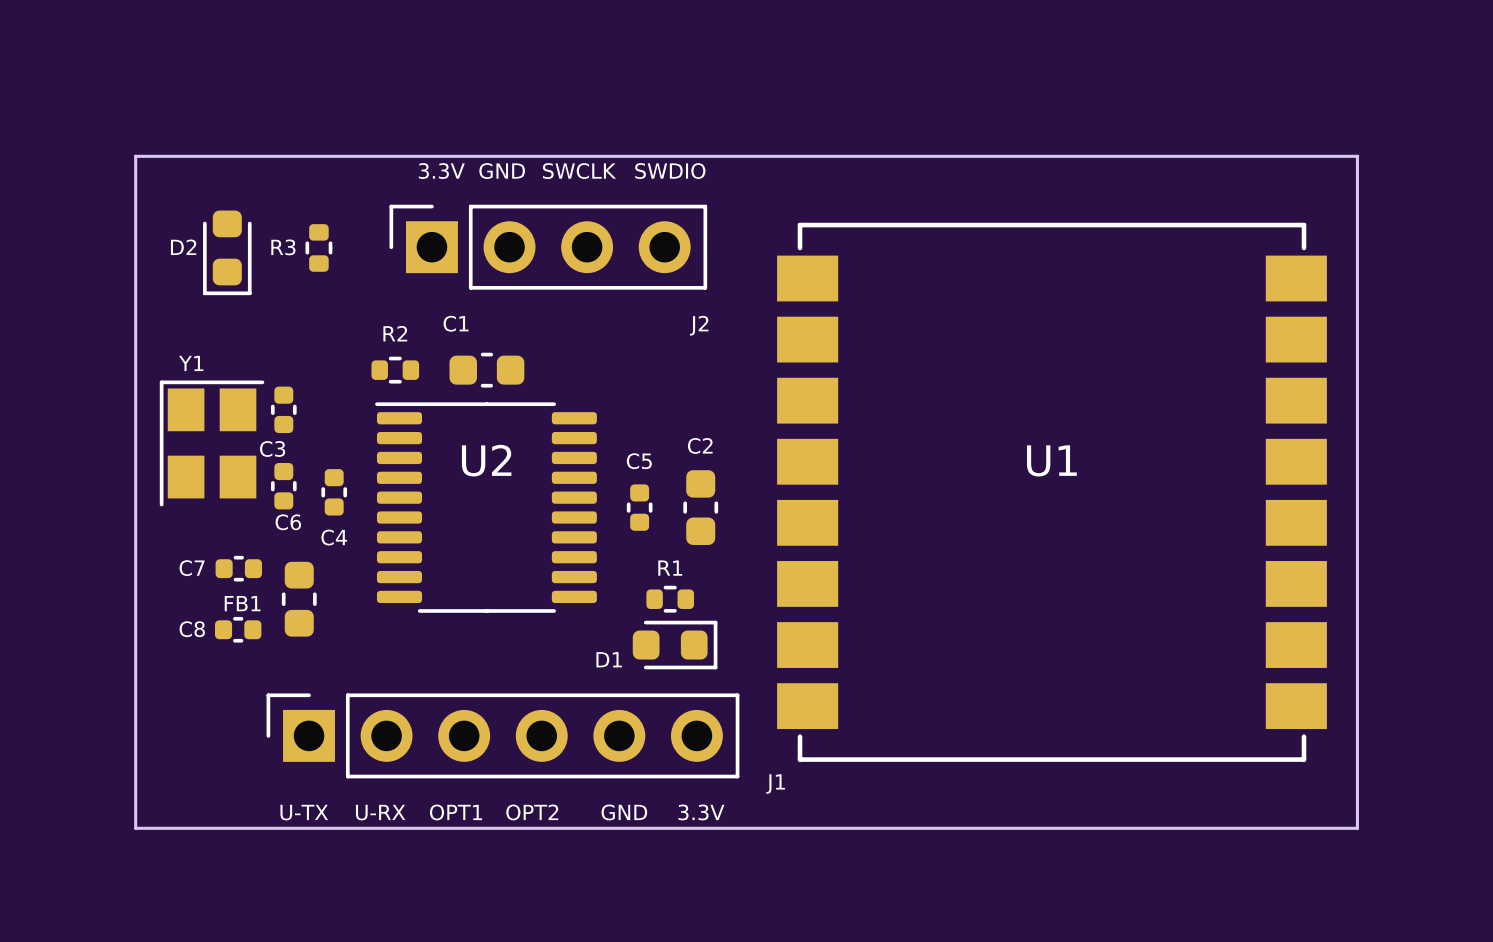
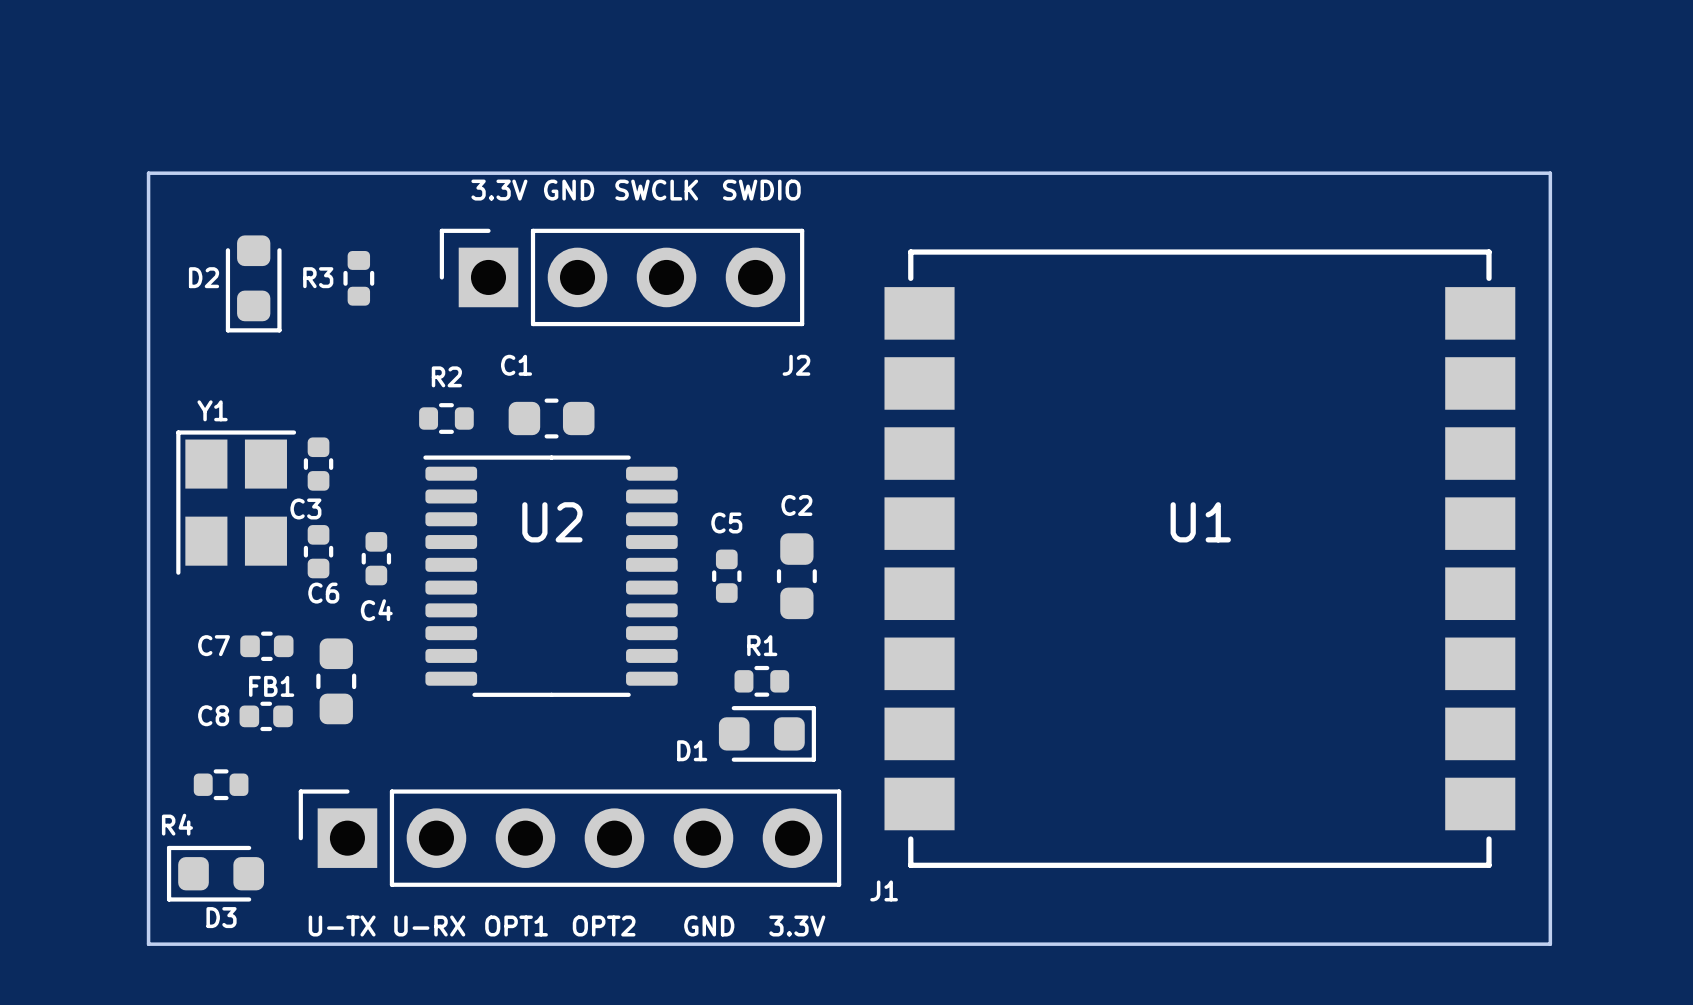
R4: none -> (221, 784)
D3: none -> (215, 873)

